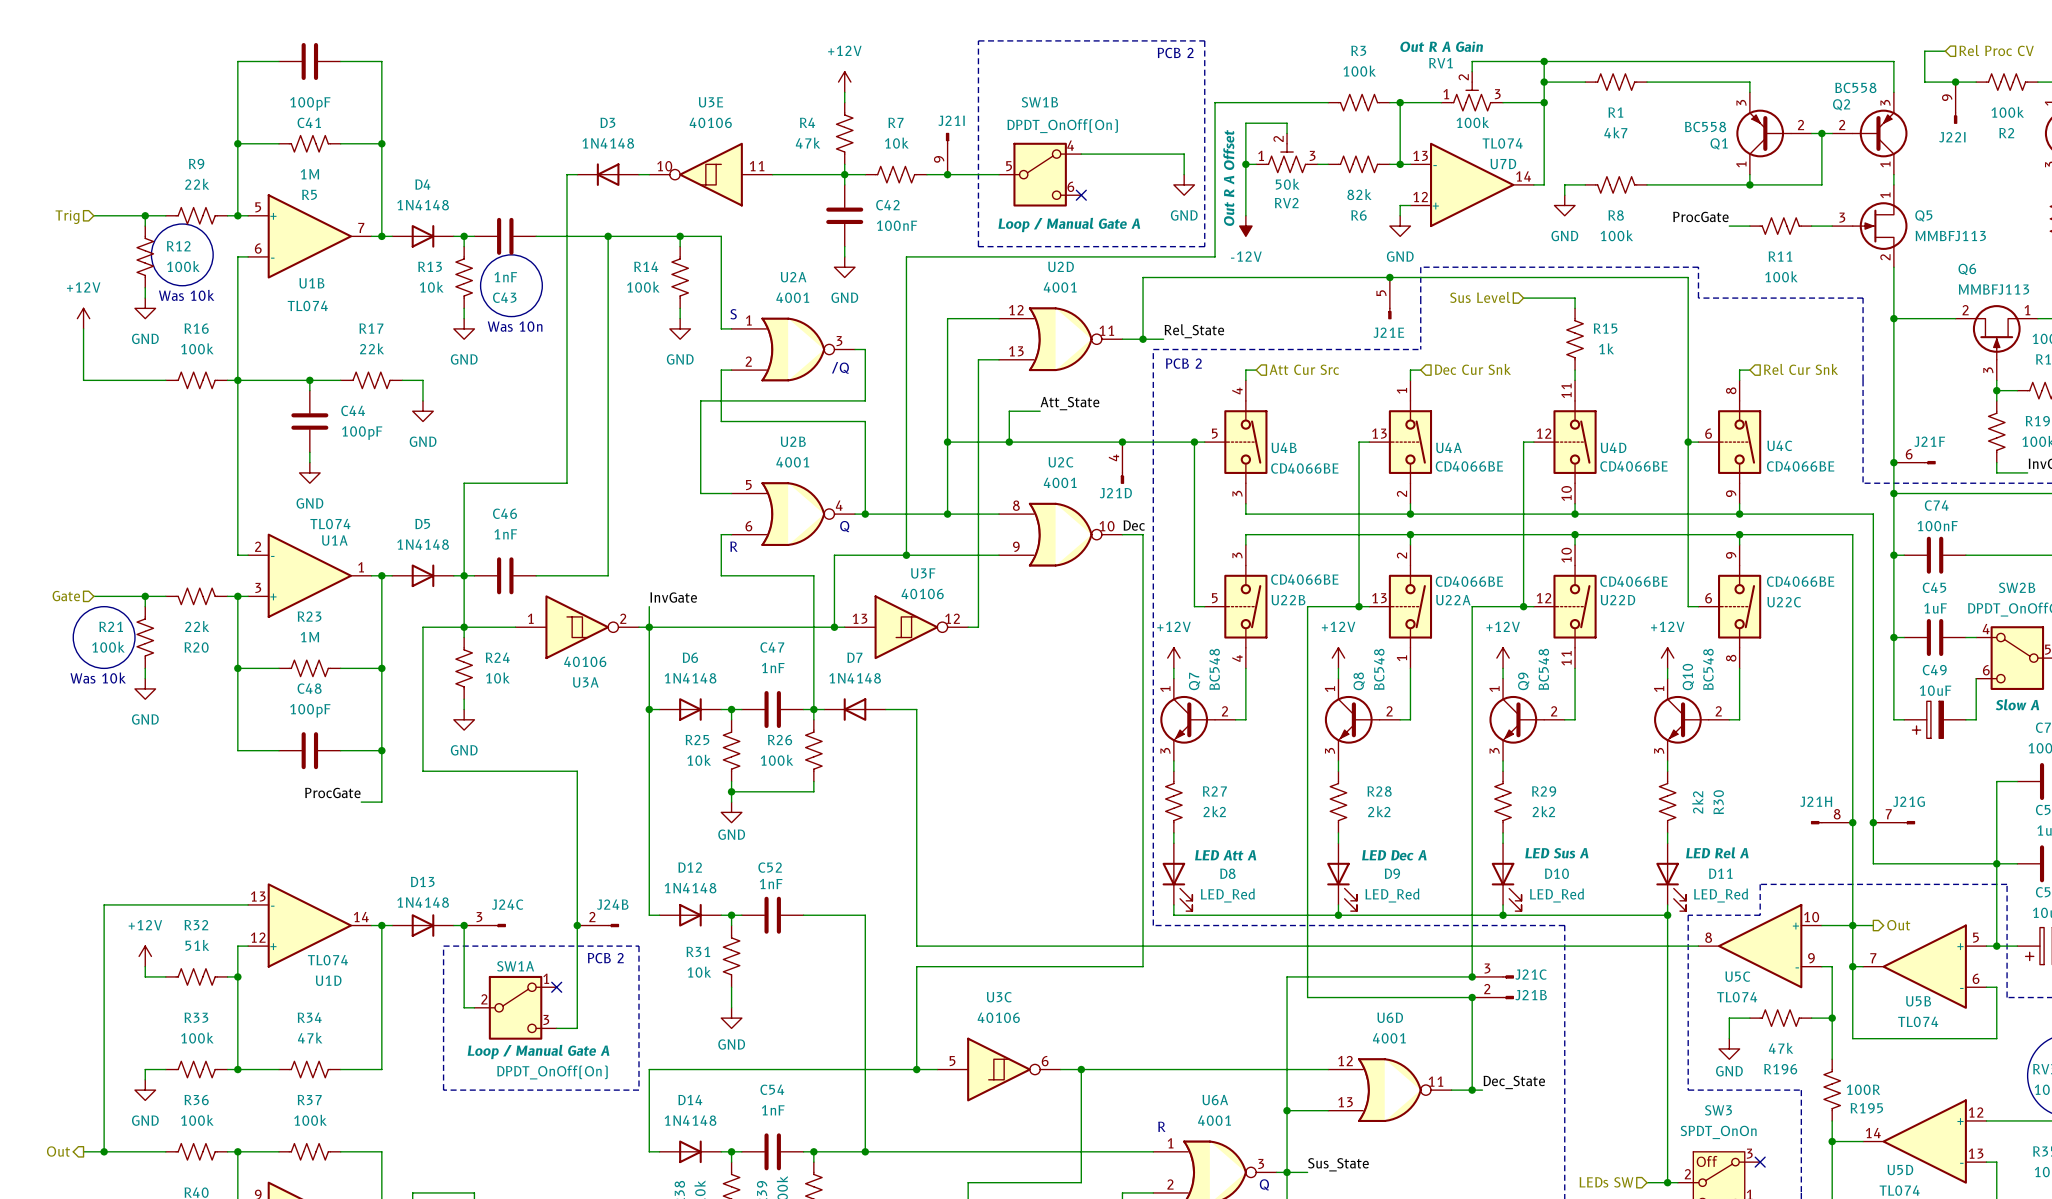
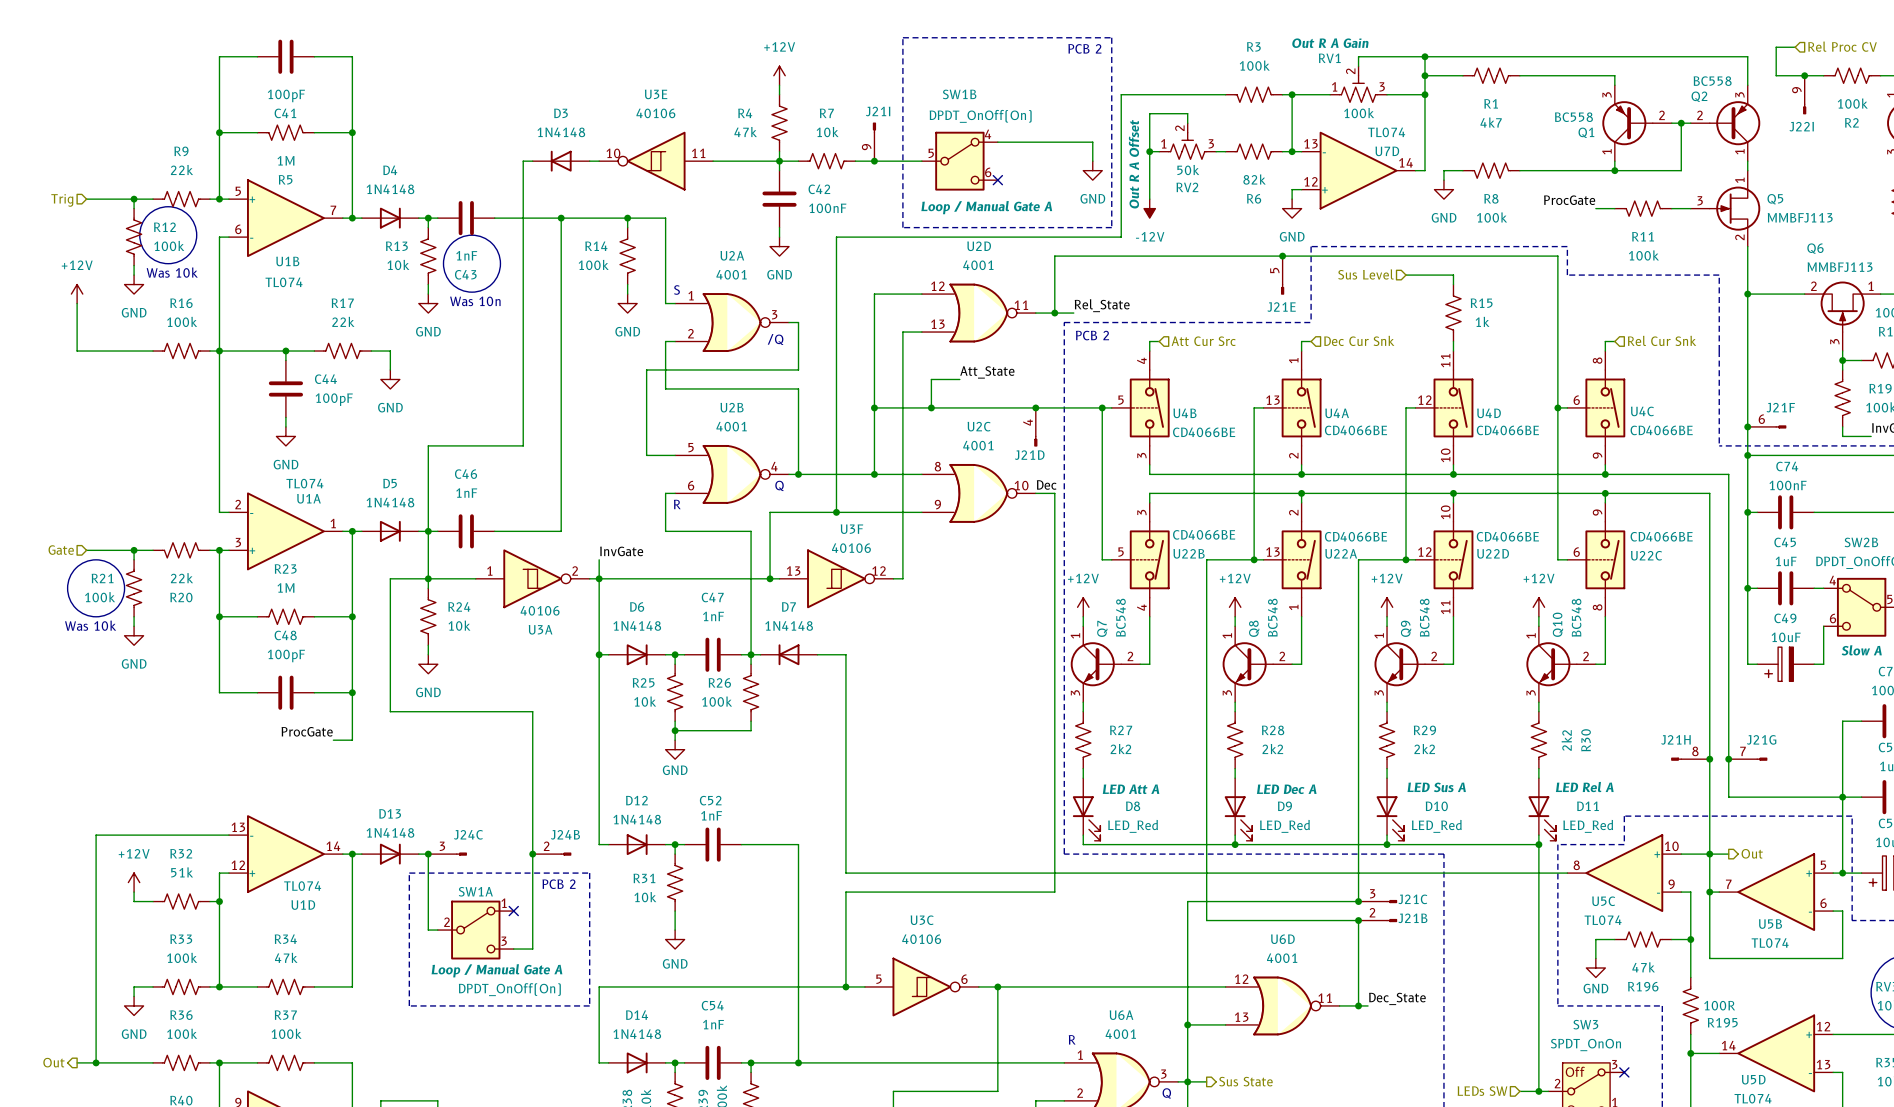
label: Sus_State (1338, 1164) -> none
hierarchical label: none -> Sus State (1245, 1081)

